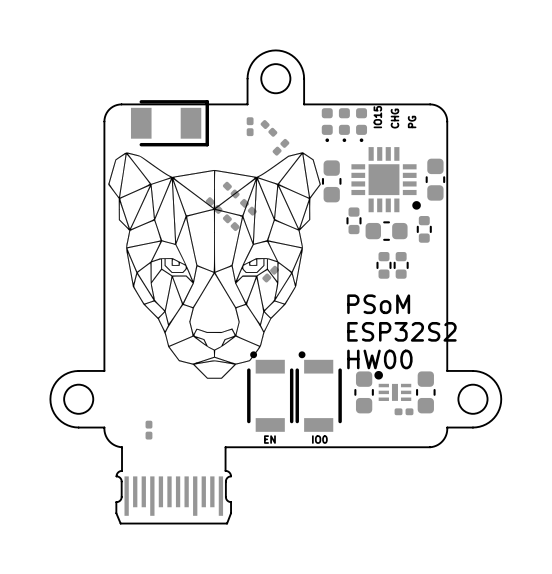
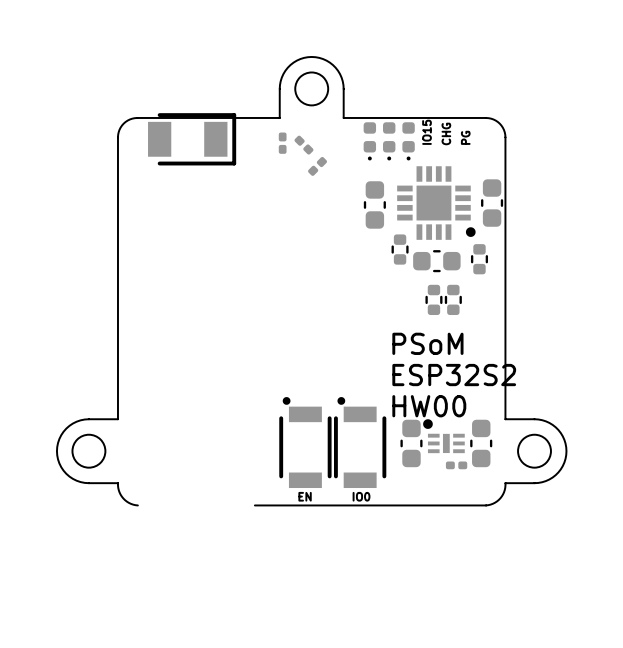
drawing: [108, 152, 321, 379] -> none
part: (231, 190) -> none
part: (214, 205) -> none
part: (248, 207) -> none
part: (231, 222) -> none
part: (270, 274) -> none
part: (148, 430) -> none
part: (173, 485) -> none

